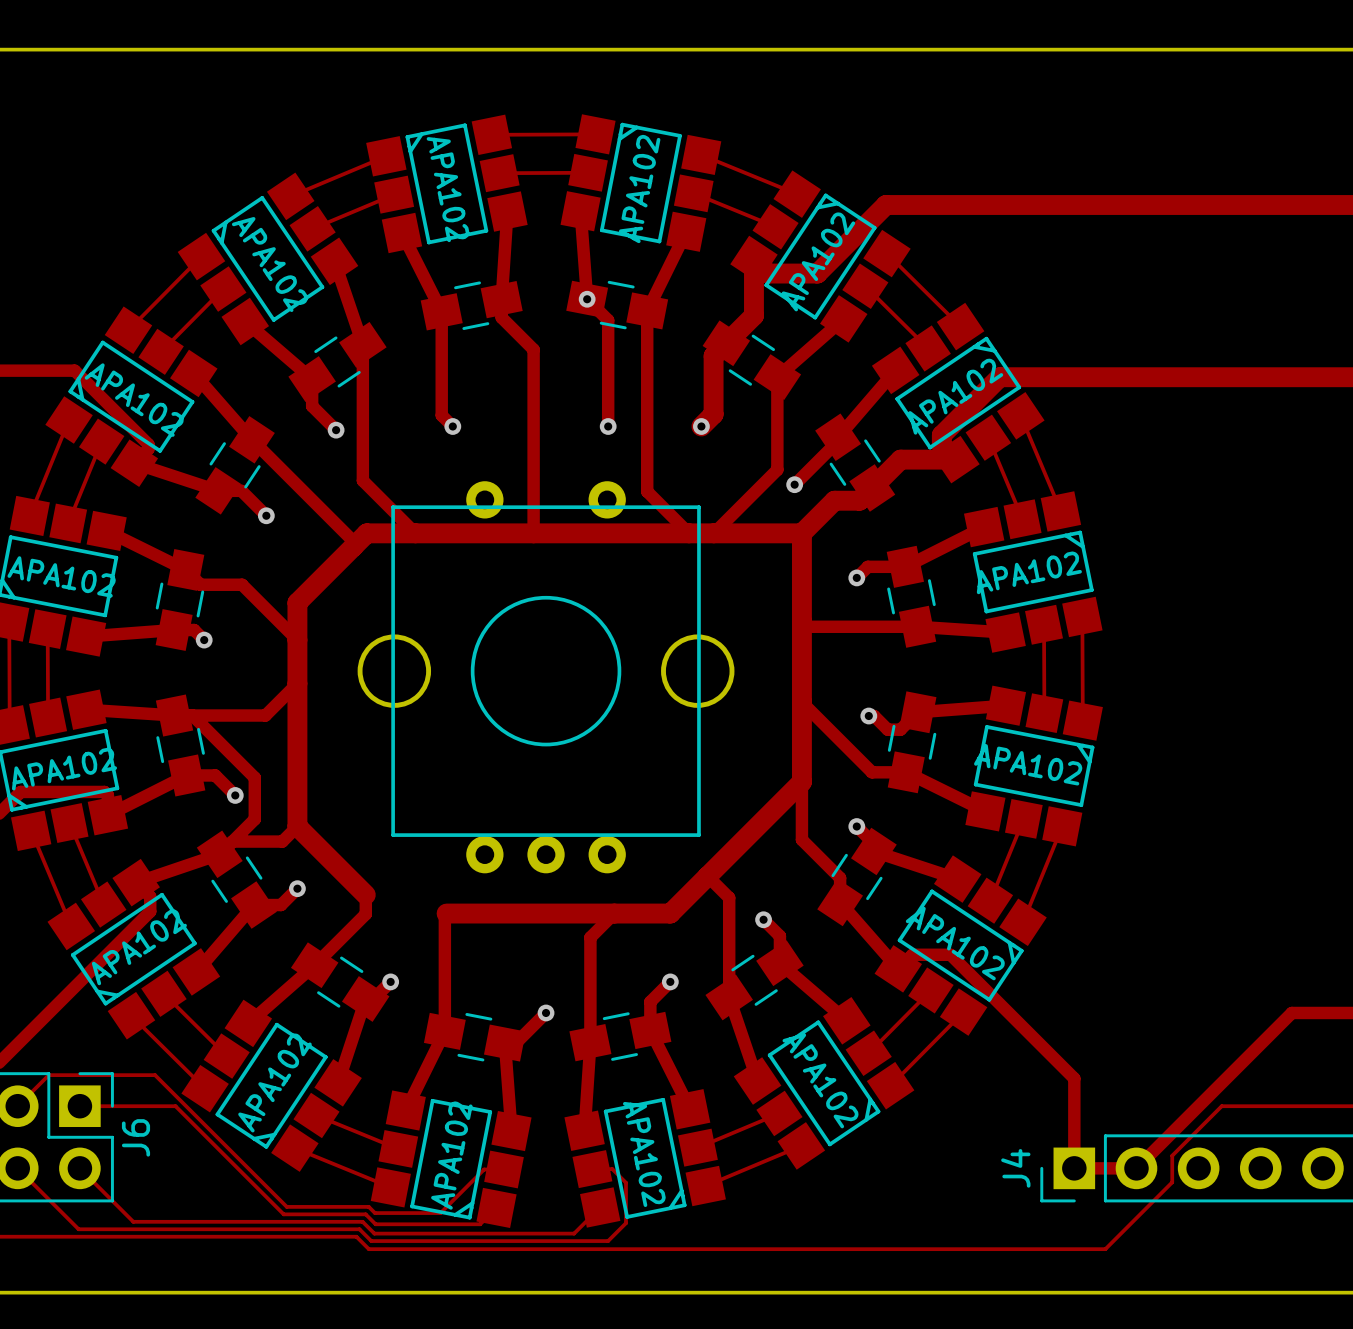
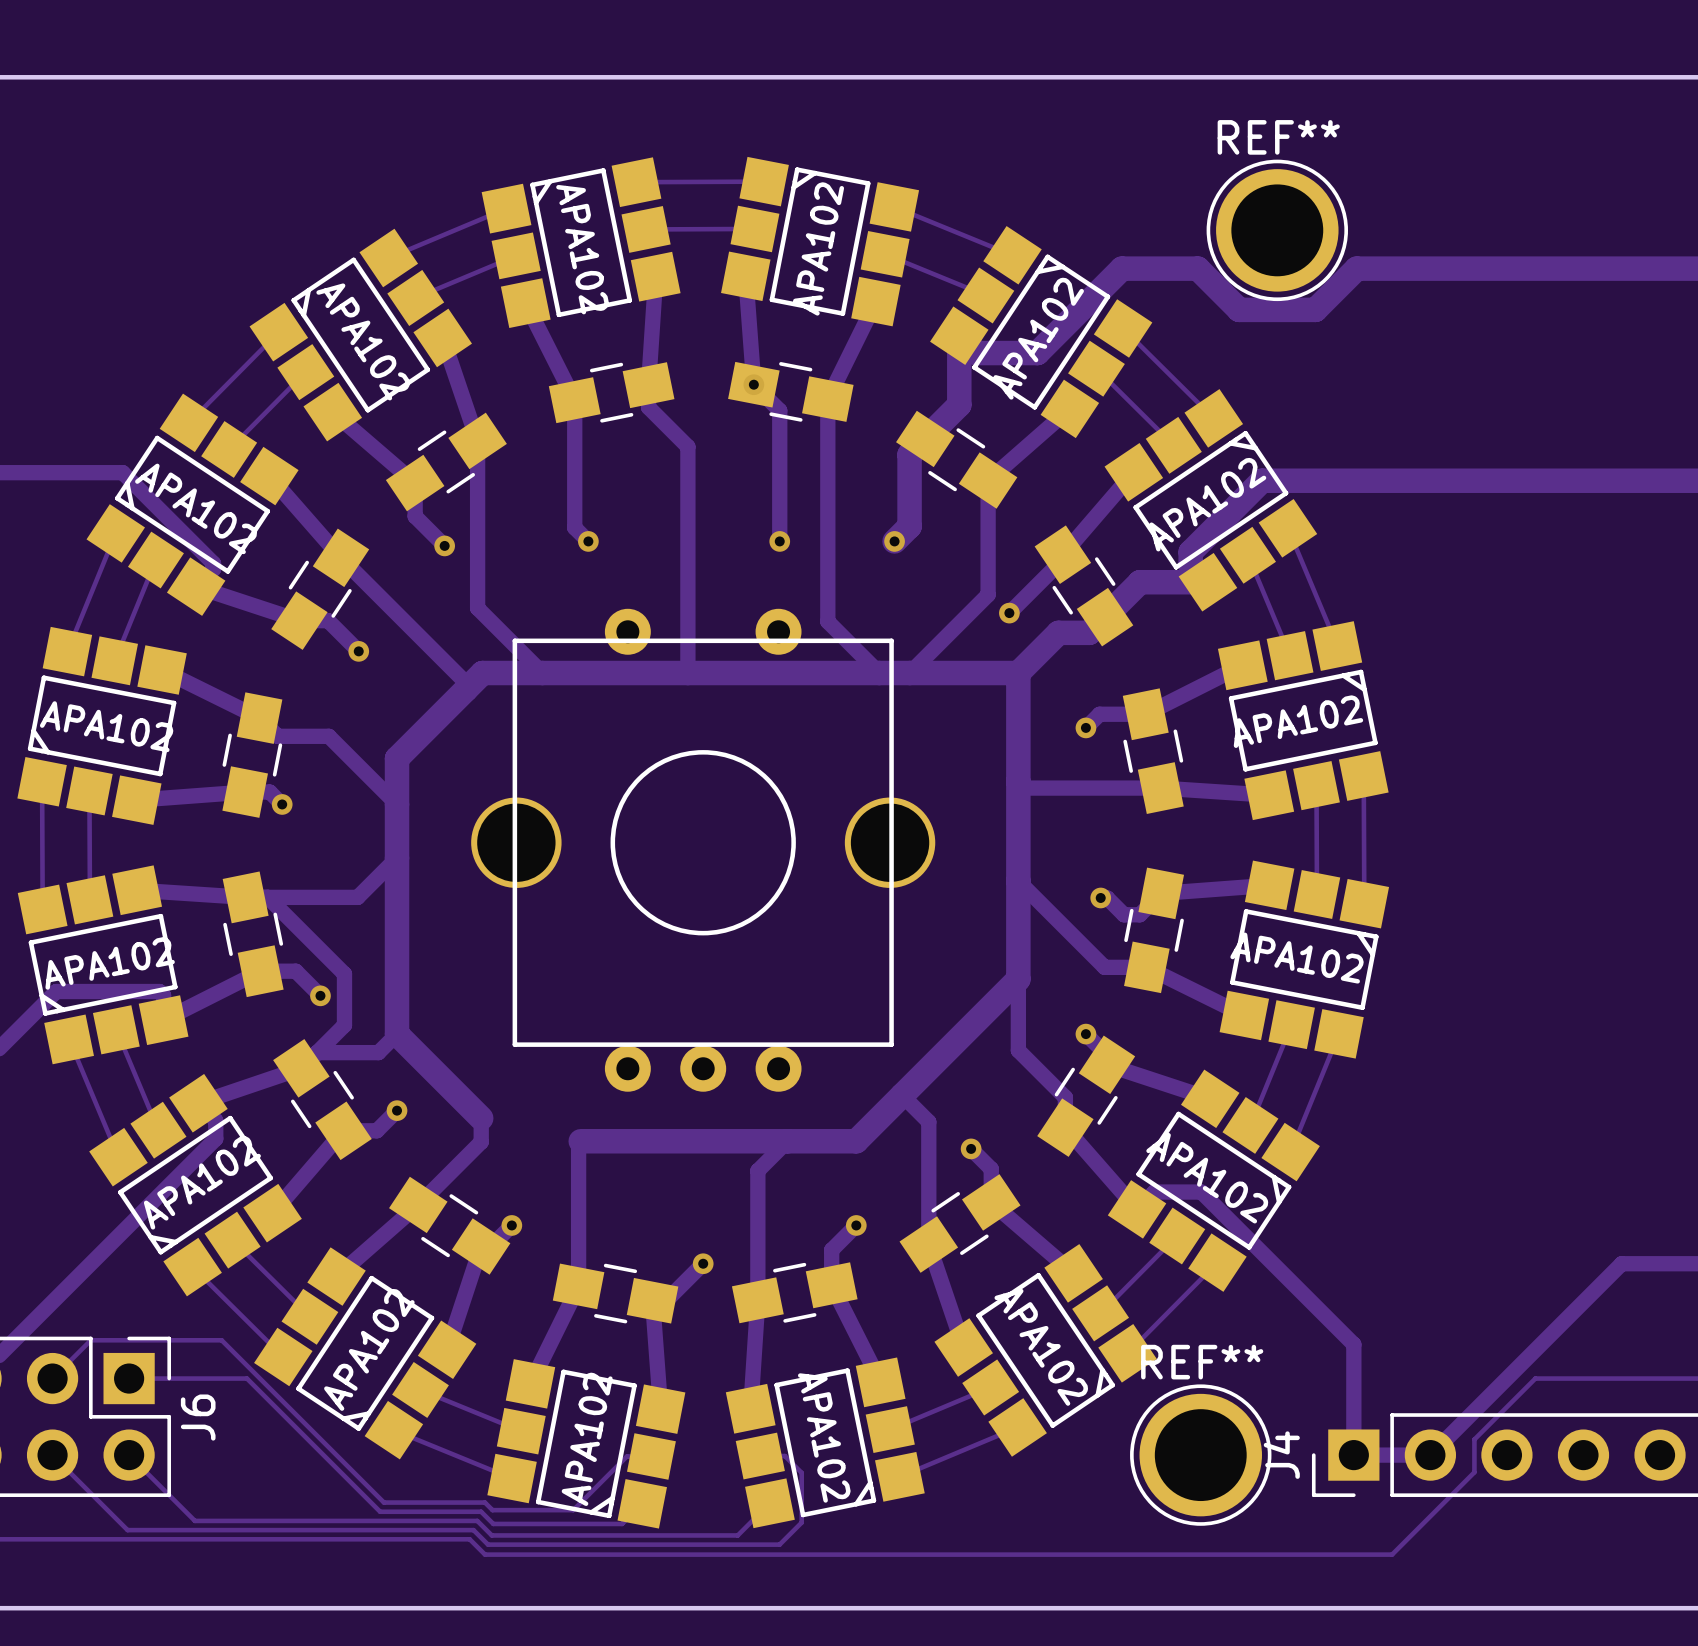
REF**: none -> (1277, 230)
track: (947, 205) (1076, 205) -> (1197, 268) (1239, 309) (1315, 309) (1356, 268)
REF**: none -> (1200, 1455)

